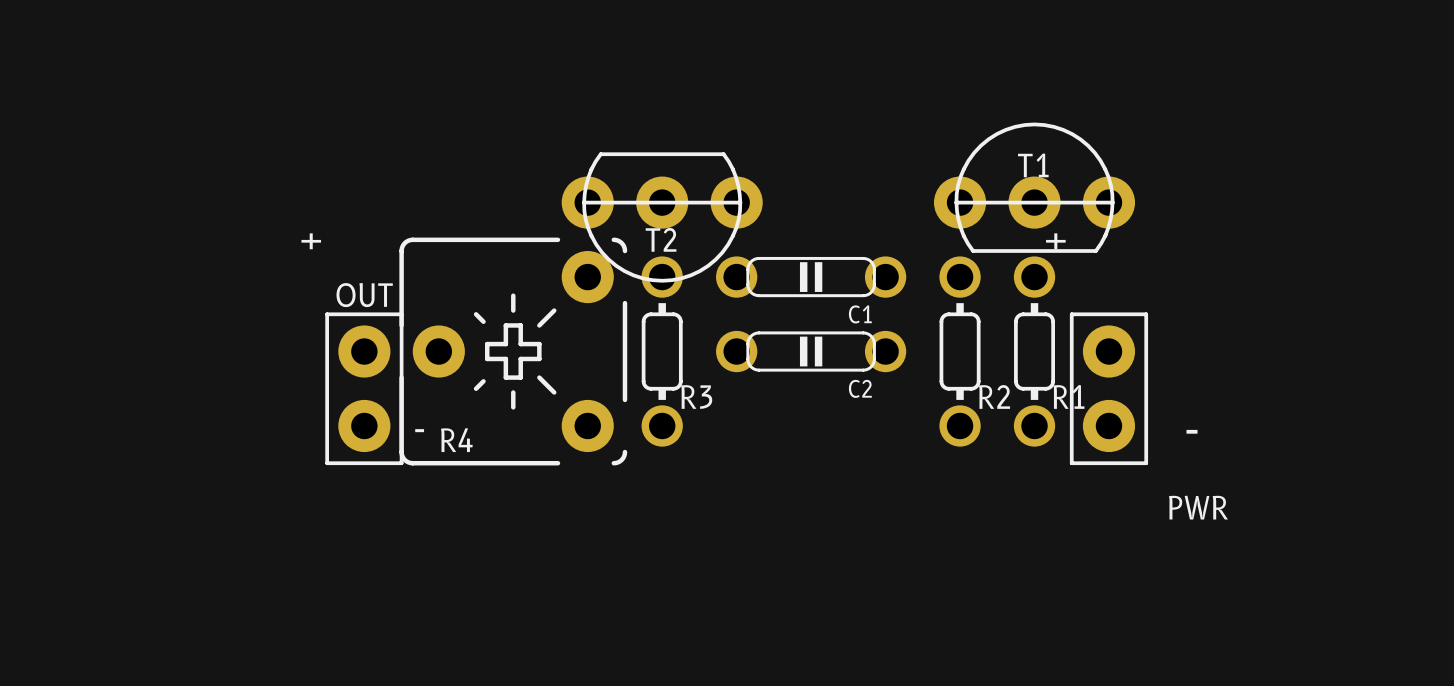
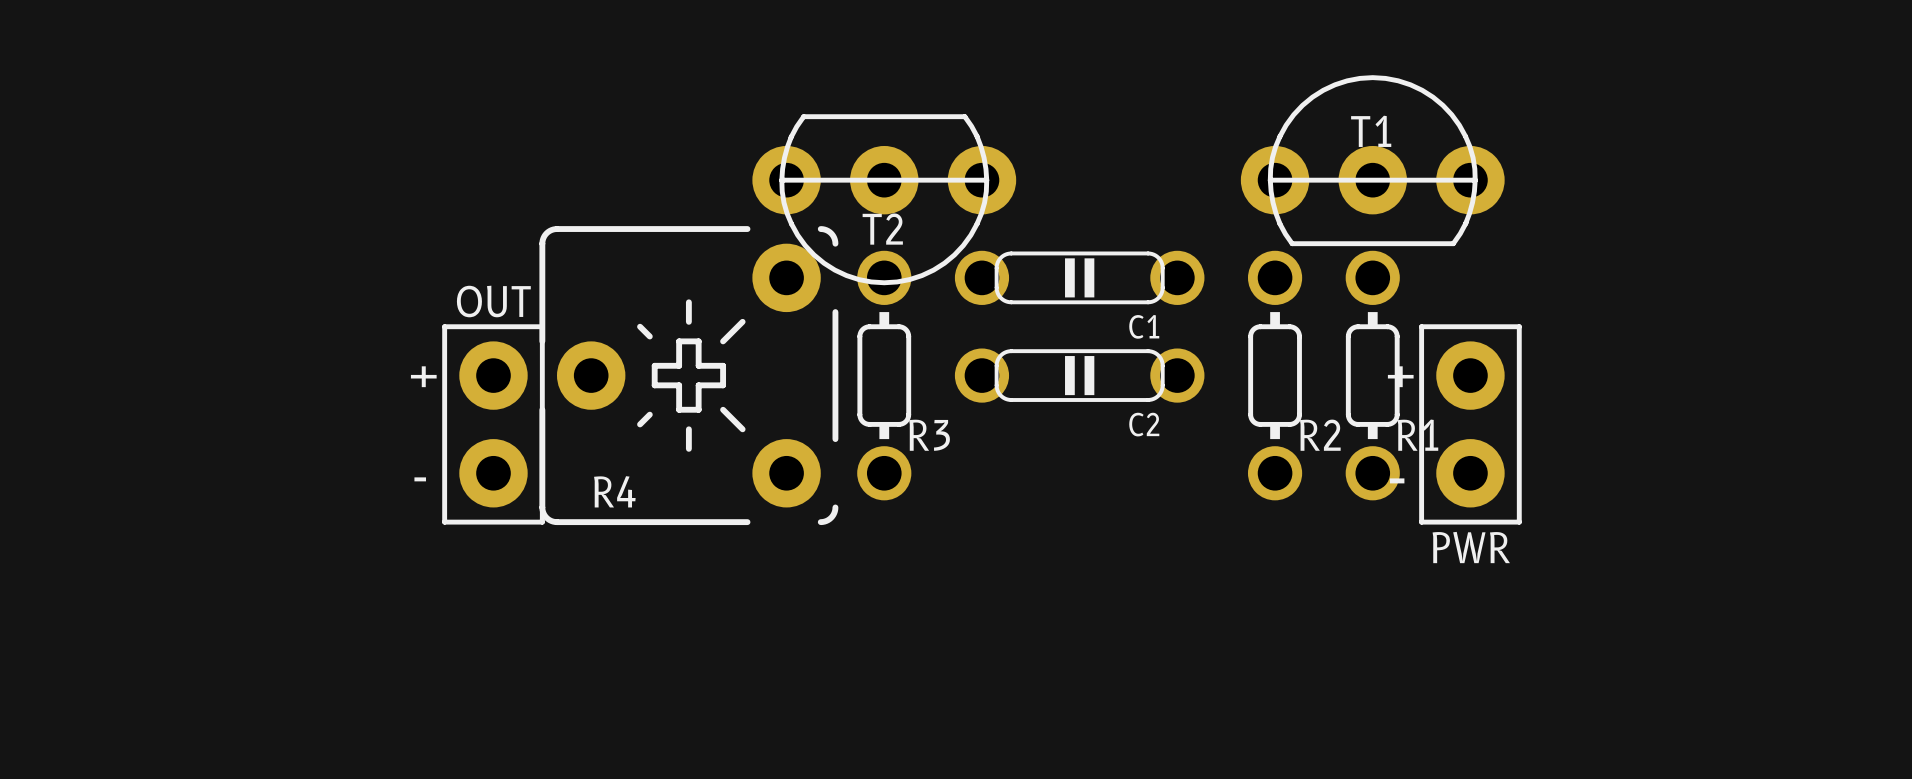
OUT footprint: [325, 312, 404, 466] -> [442, 324, 545, 525]
part footprint: [1069, 312, 1149, 466] -> [1419, 324, 1522, 525]

